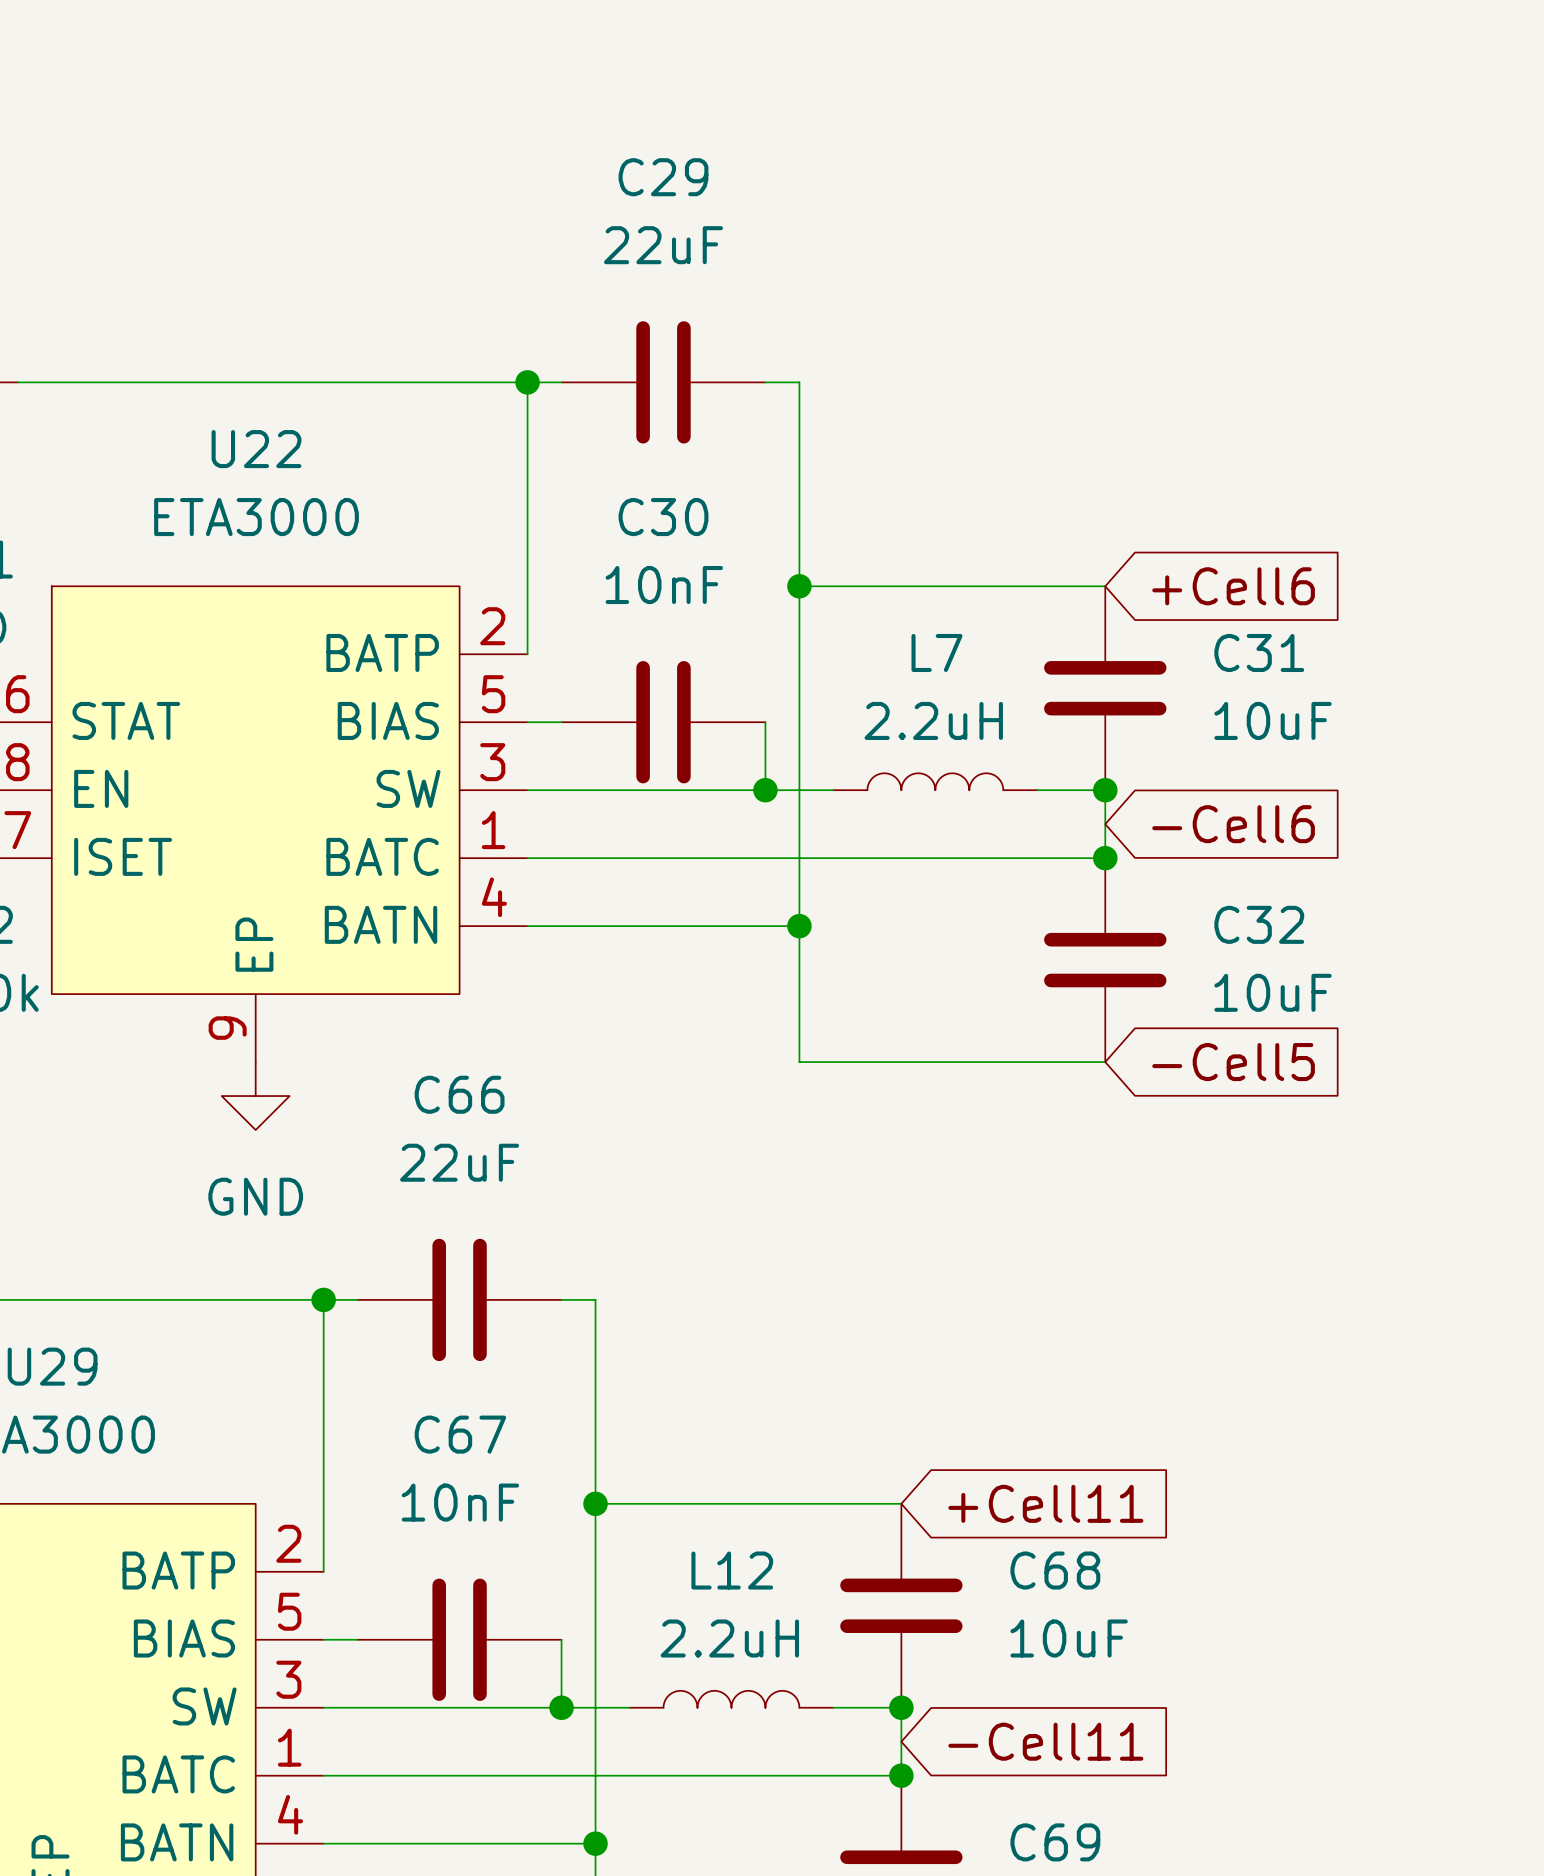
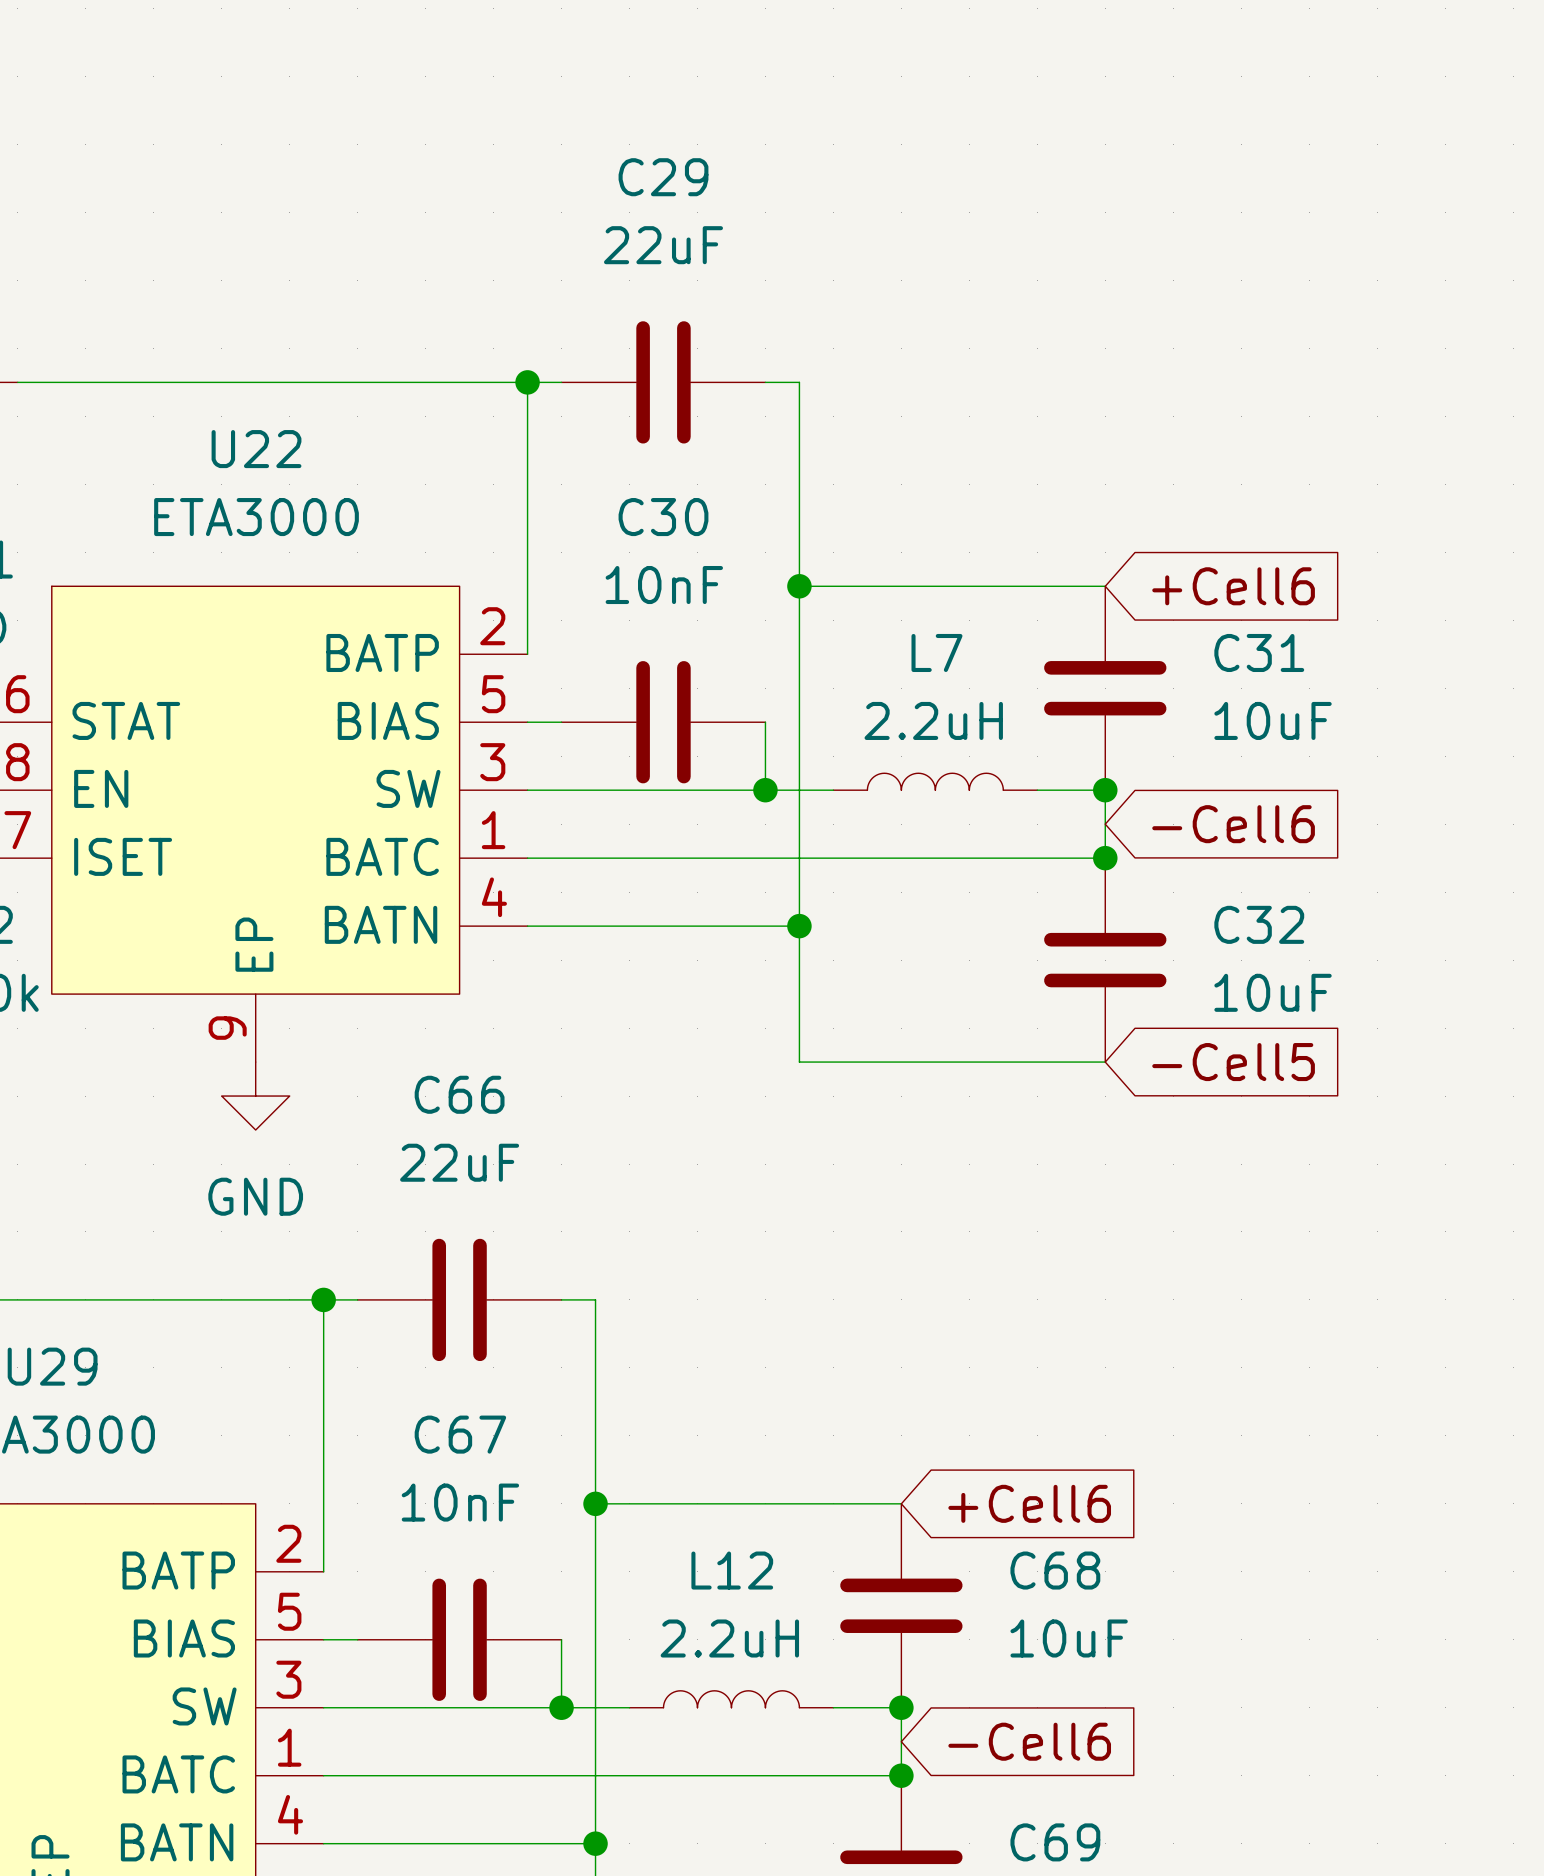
global label: +Cell11 (1045, 1503) -> +Cell6 (1029, 1503)
global label: -Cell11 (1045, 1741) -> -Cell6 (1029, 1741)

